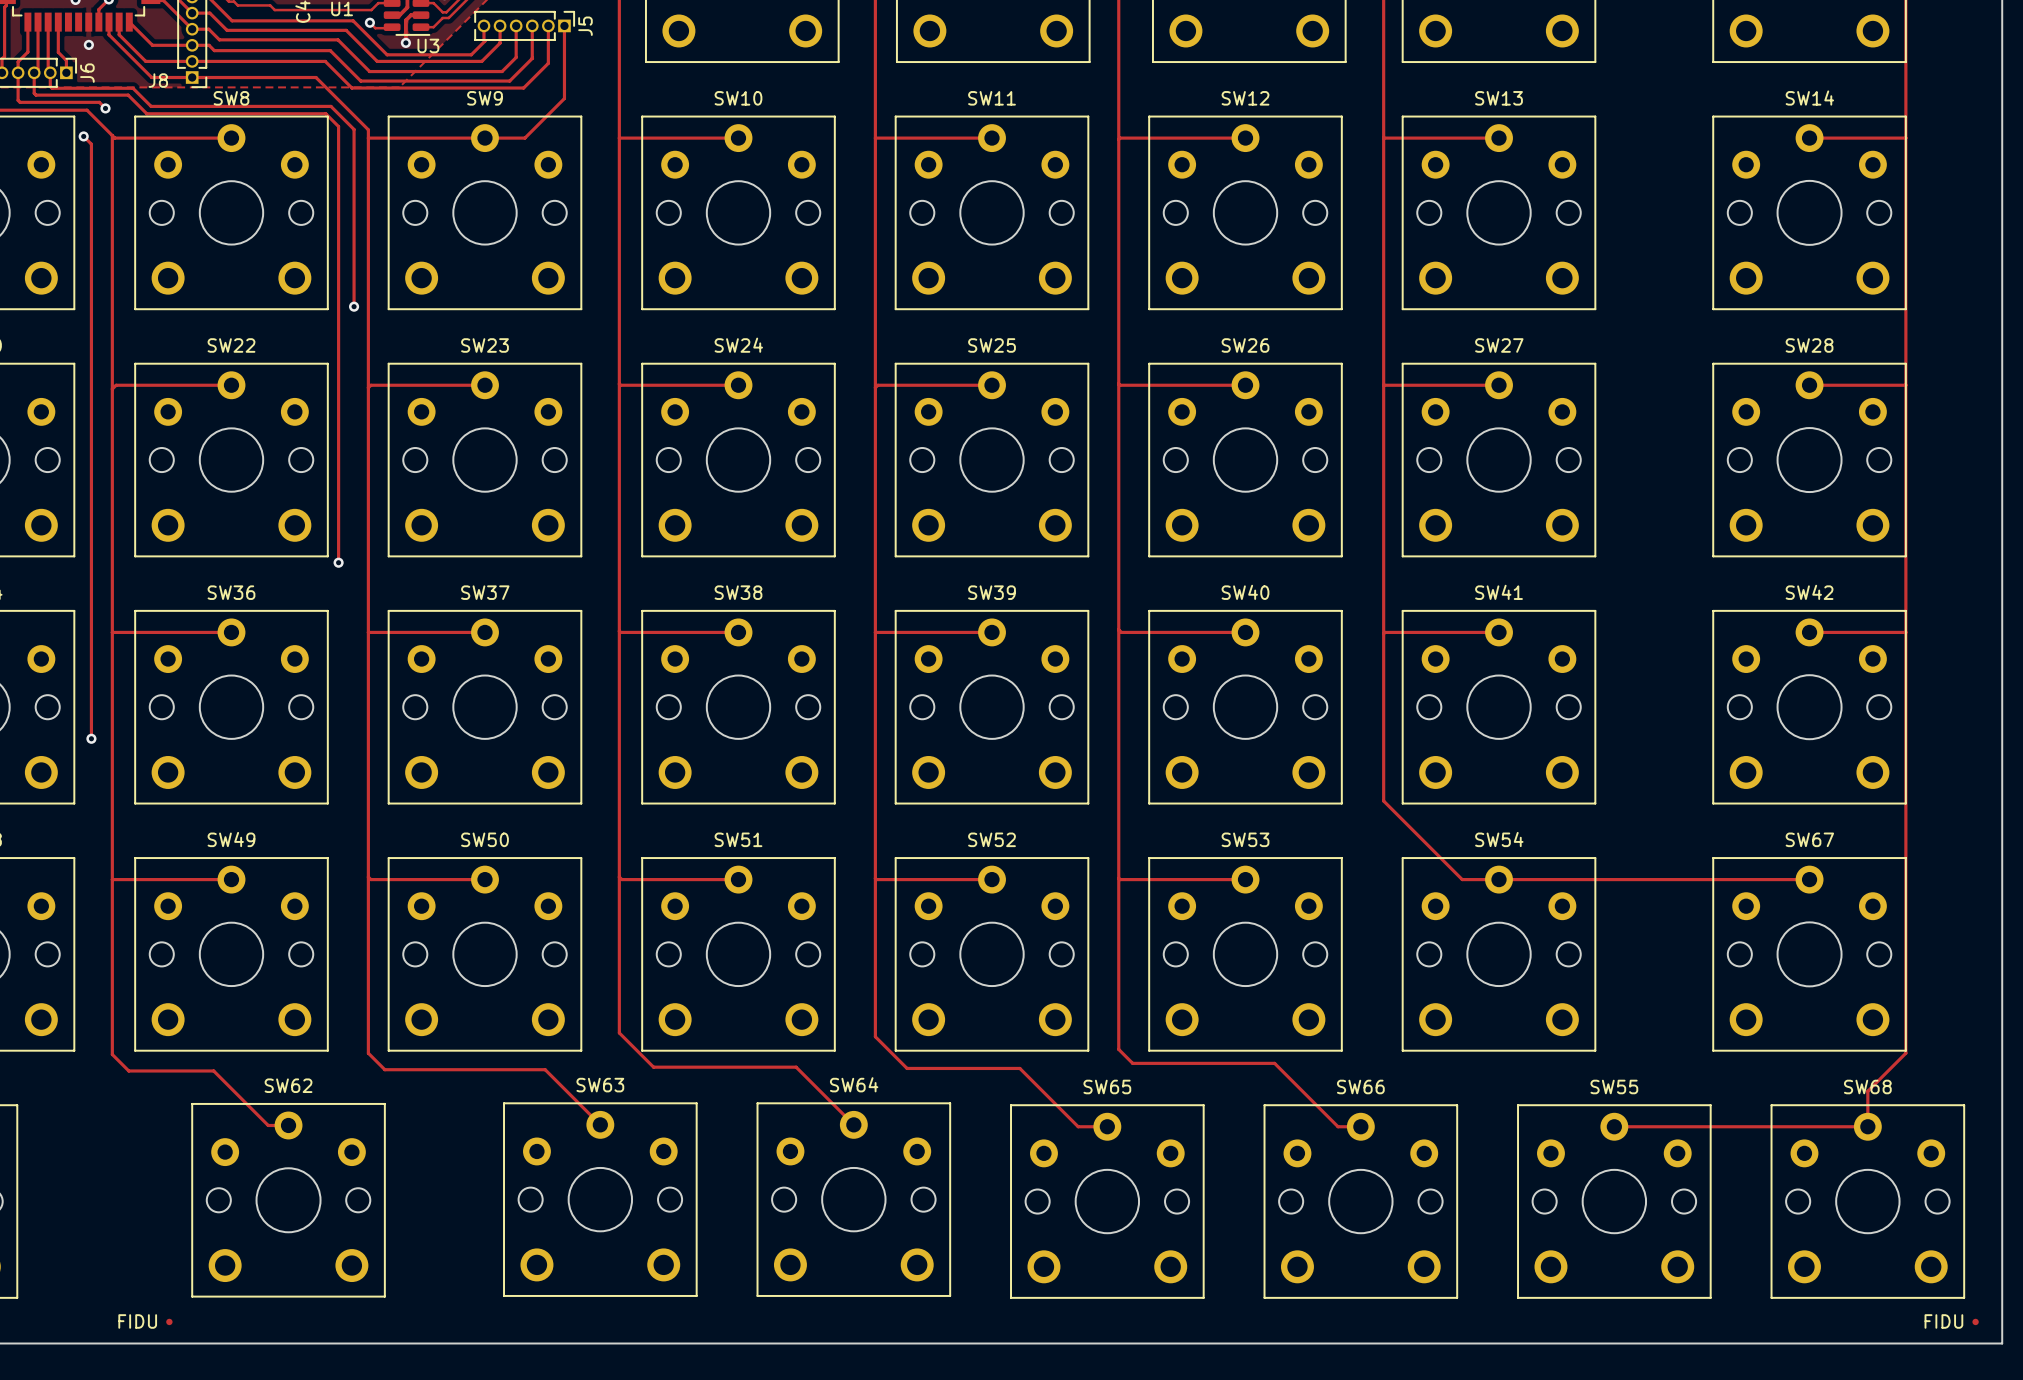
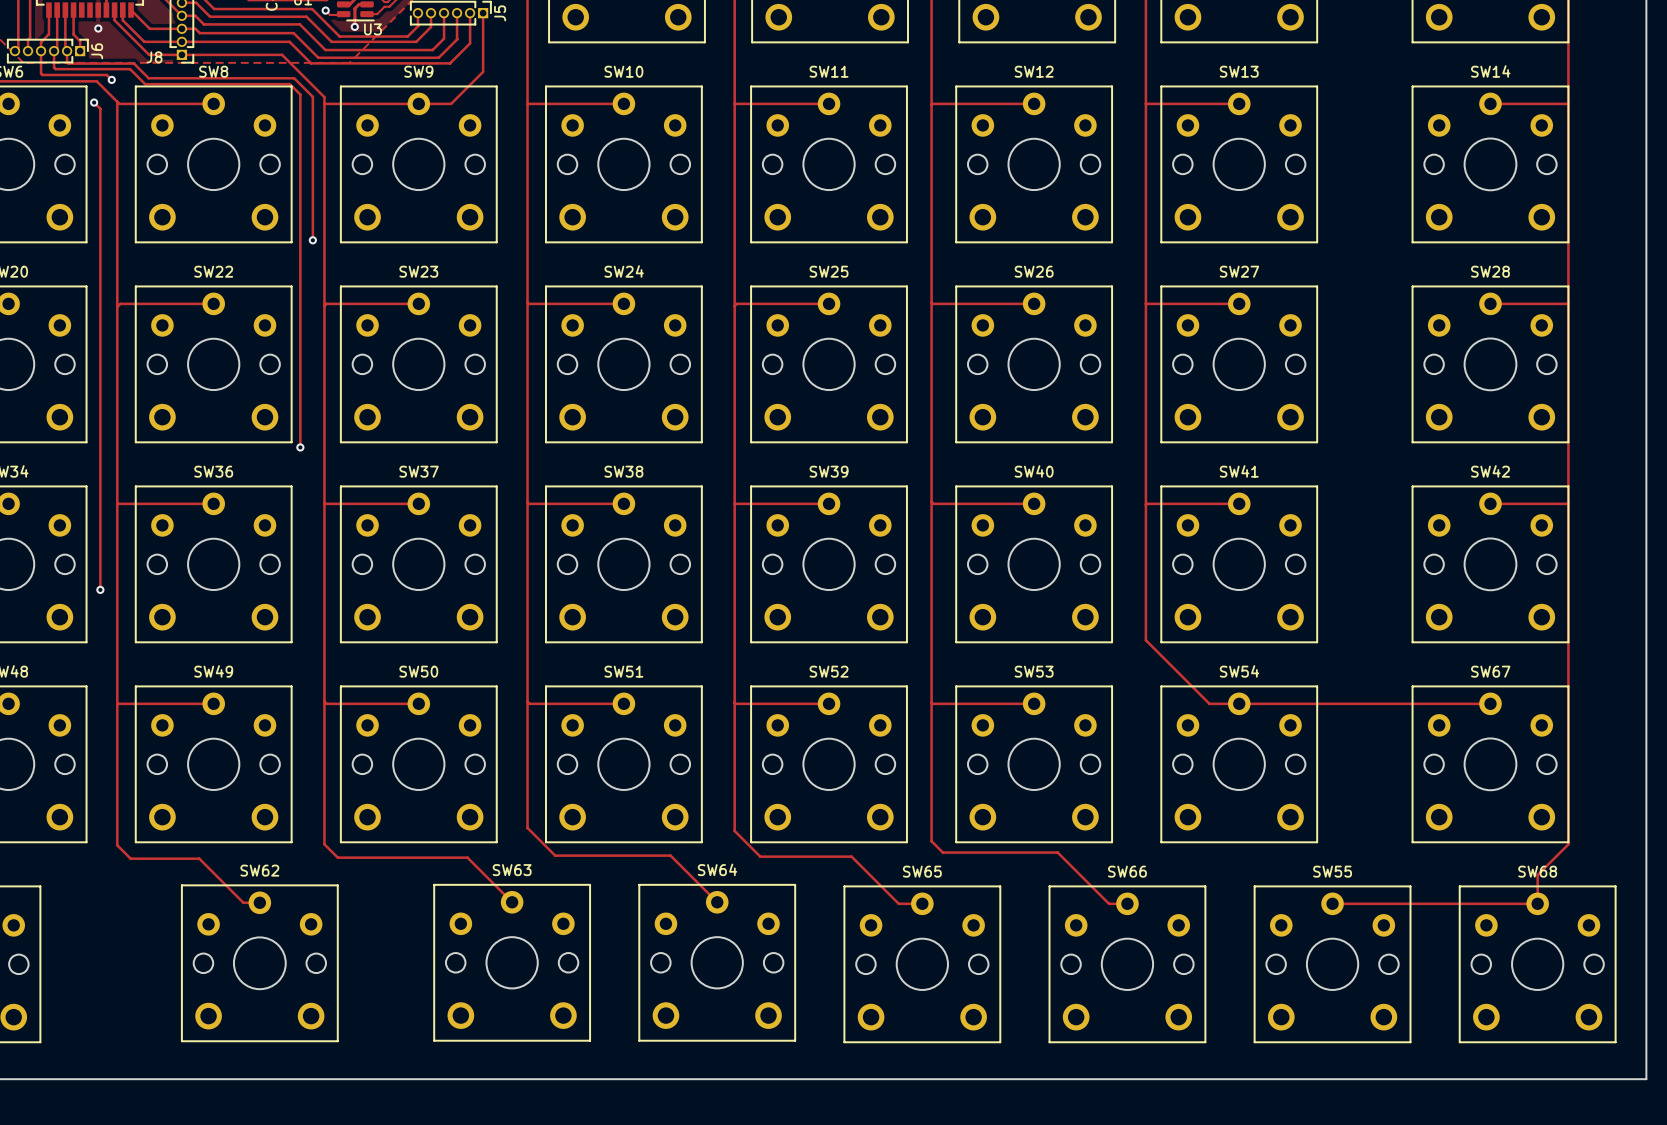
FIDU: (169, 1321) -> none
FIDU: (1975, 1321) -> none

